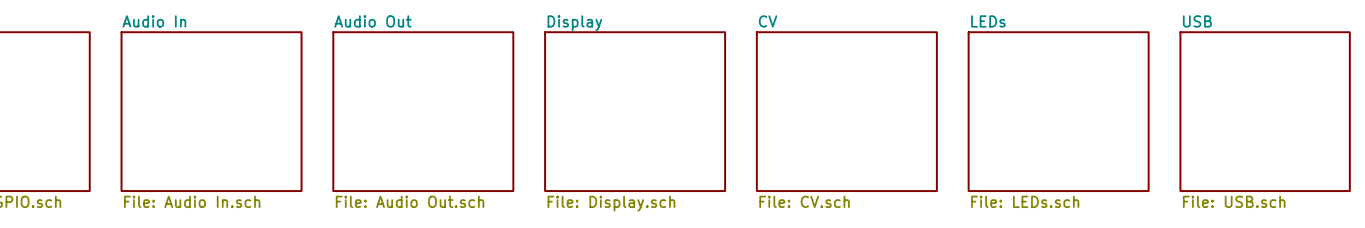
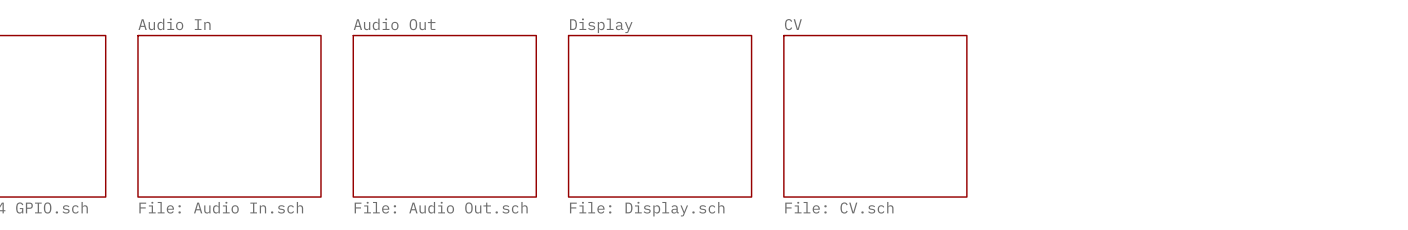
sheet LEDs: File: LEDs.sch (1058, 111) -> none
sheet USB: File: USB.sch (1265, 111) -> none

